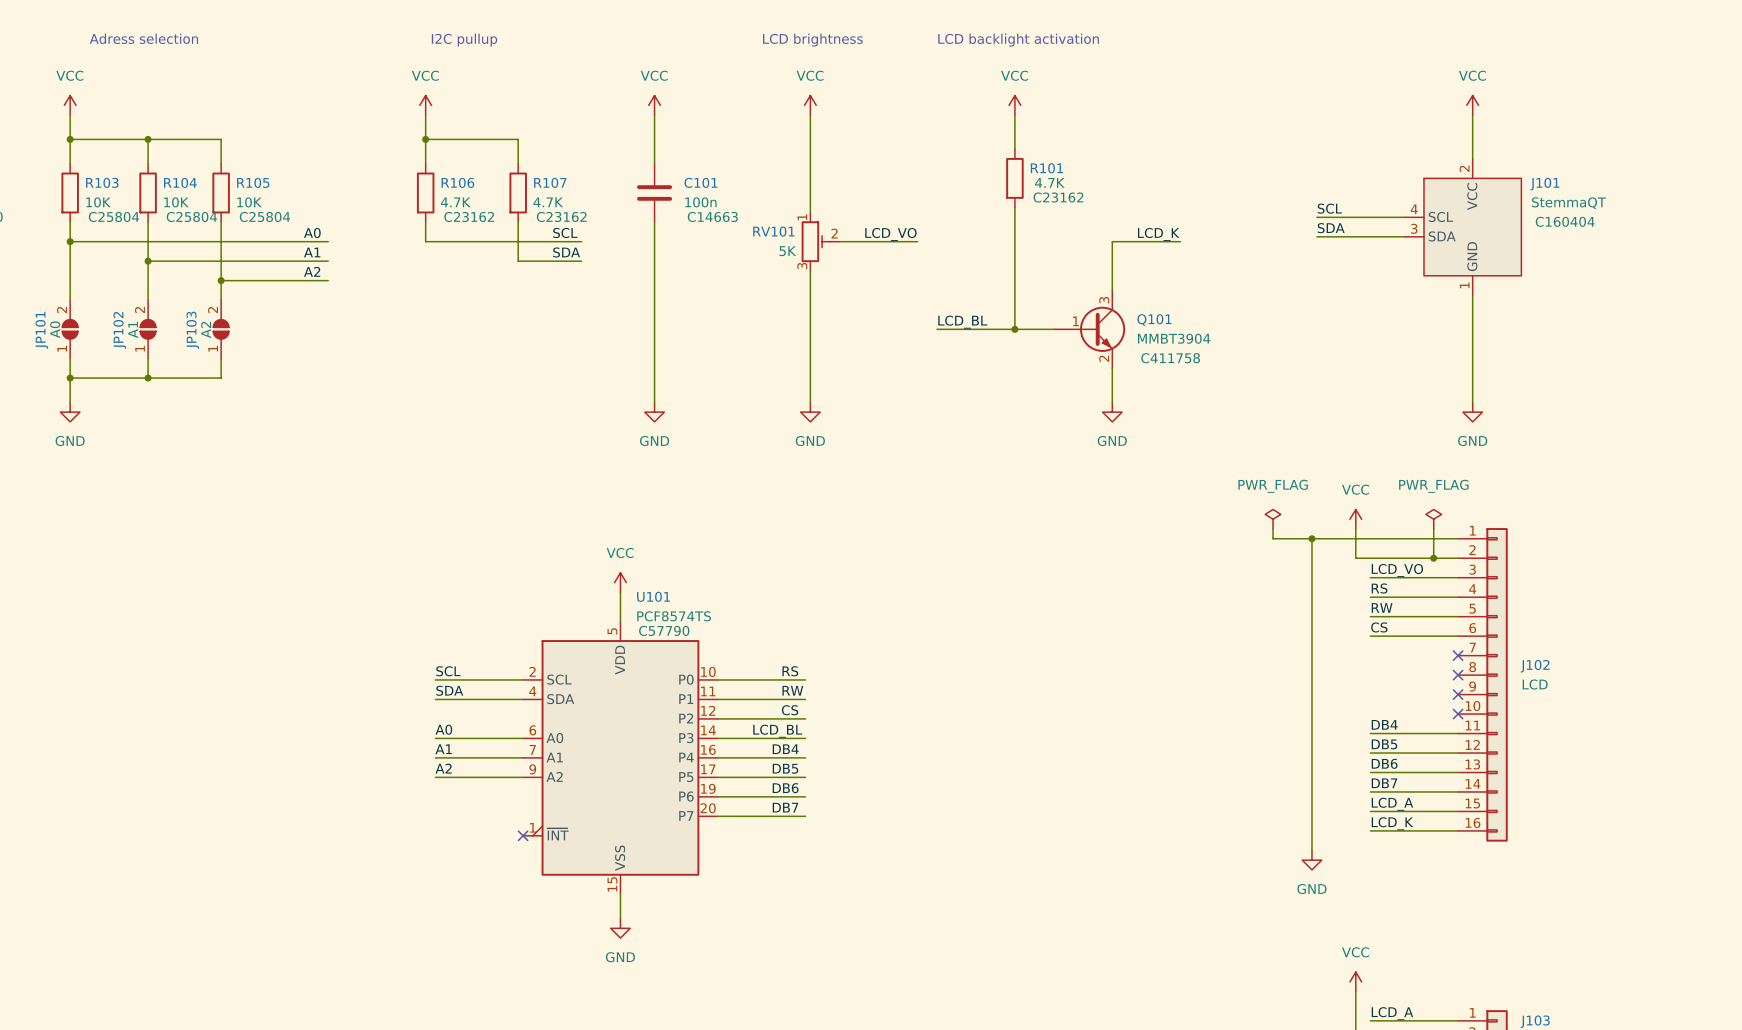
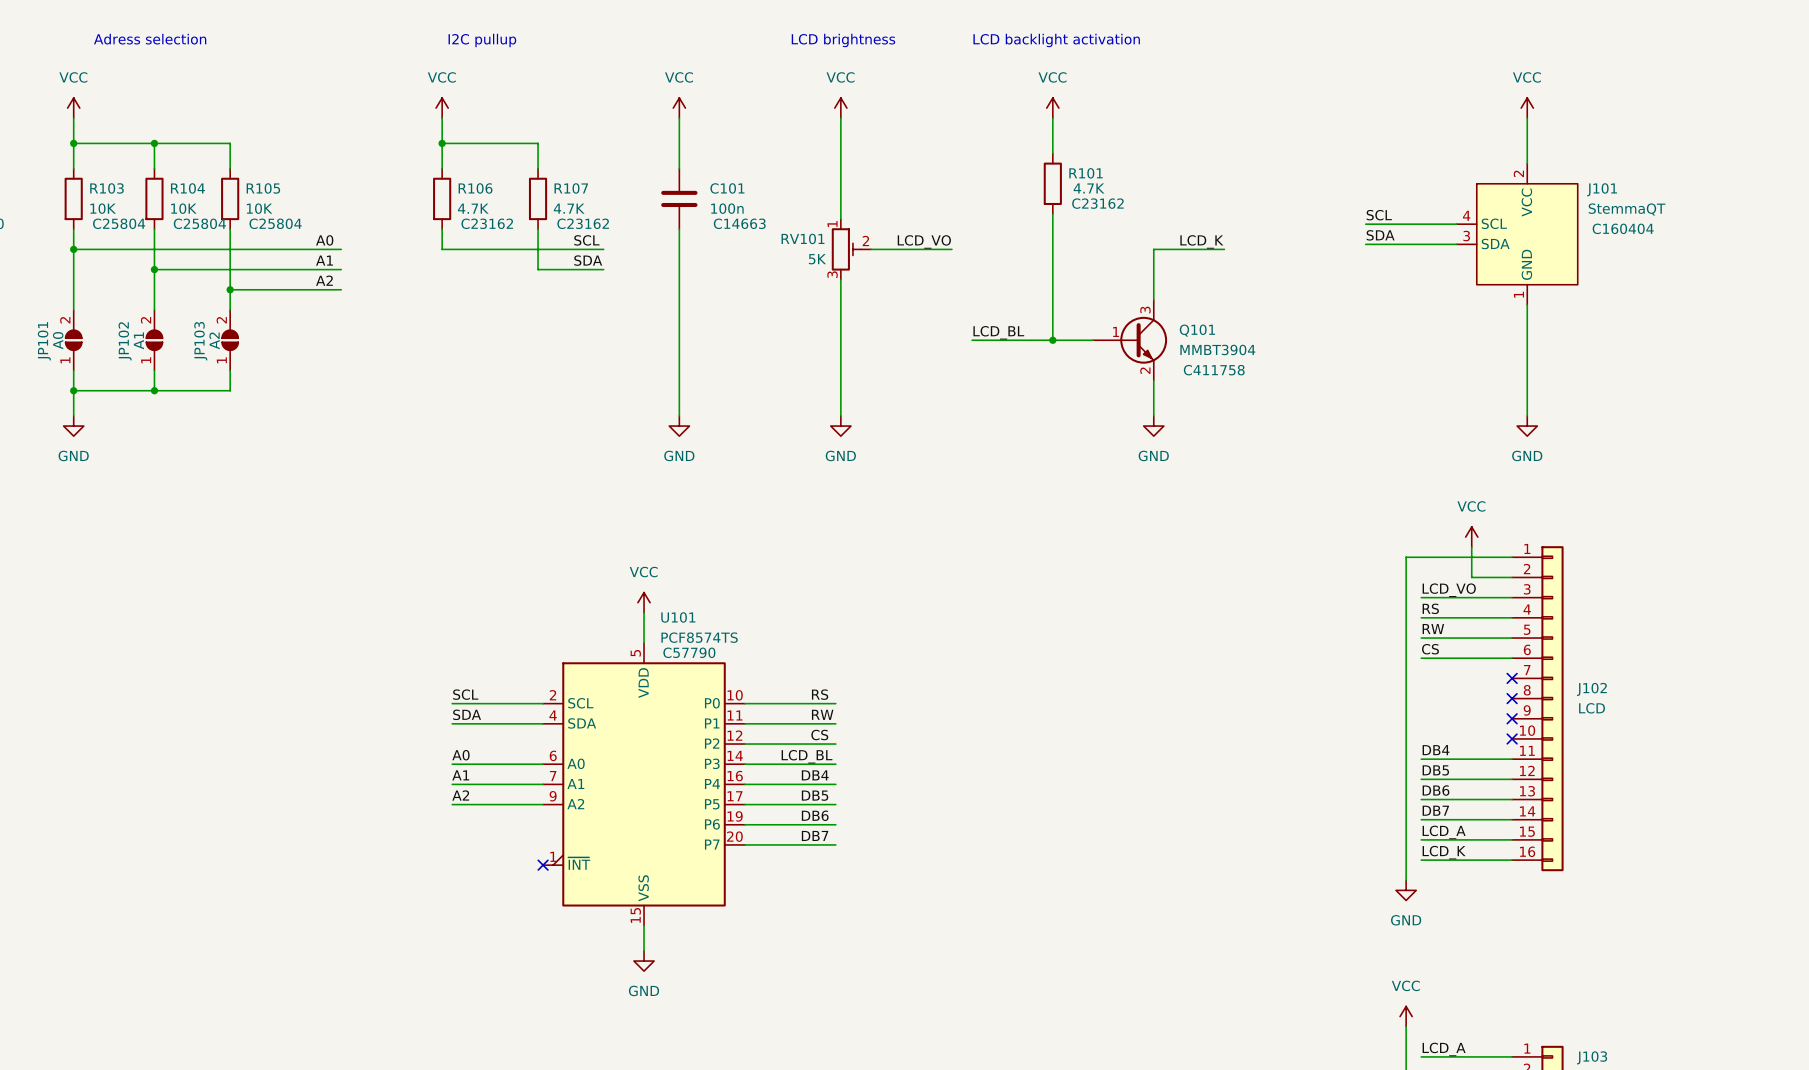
power symbol: PWR_FLAG (1273, 519) -> none
power symbol position: VCC (1355, 519) -> VCC (1471, 537)
power symbol: PWR_FLAG (1433, 519) -> none
wire: (1273, 529) (1273, 538) (1355, 538) (1355, 529) -> none
wire: (1433, 529) (1433, 558) -> none
wire: (1311, 538) (1311, 850) -> none
junction: (1311, 538) -> none
wire: (1355, 558) (1419, 558) -> (1471, 547) (1471, 577)
wire: none -> (1406, 577) (1406, 880)
junction: (1433, 558) -> none
power symbol position: GND (1311, 860) -> GND (1406, 890)

